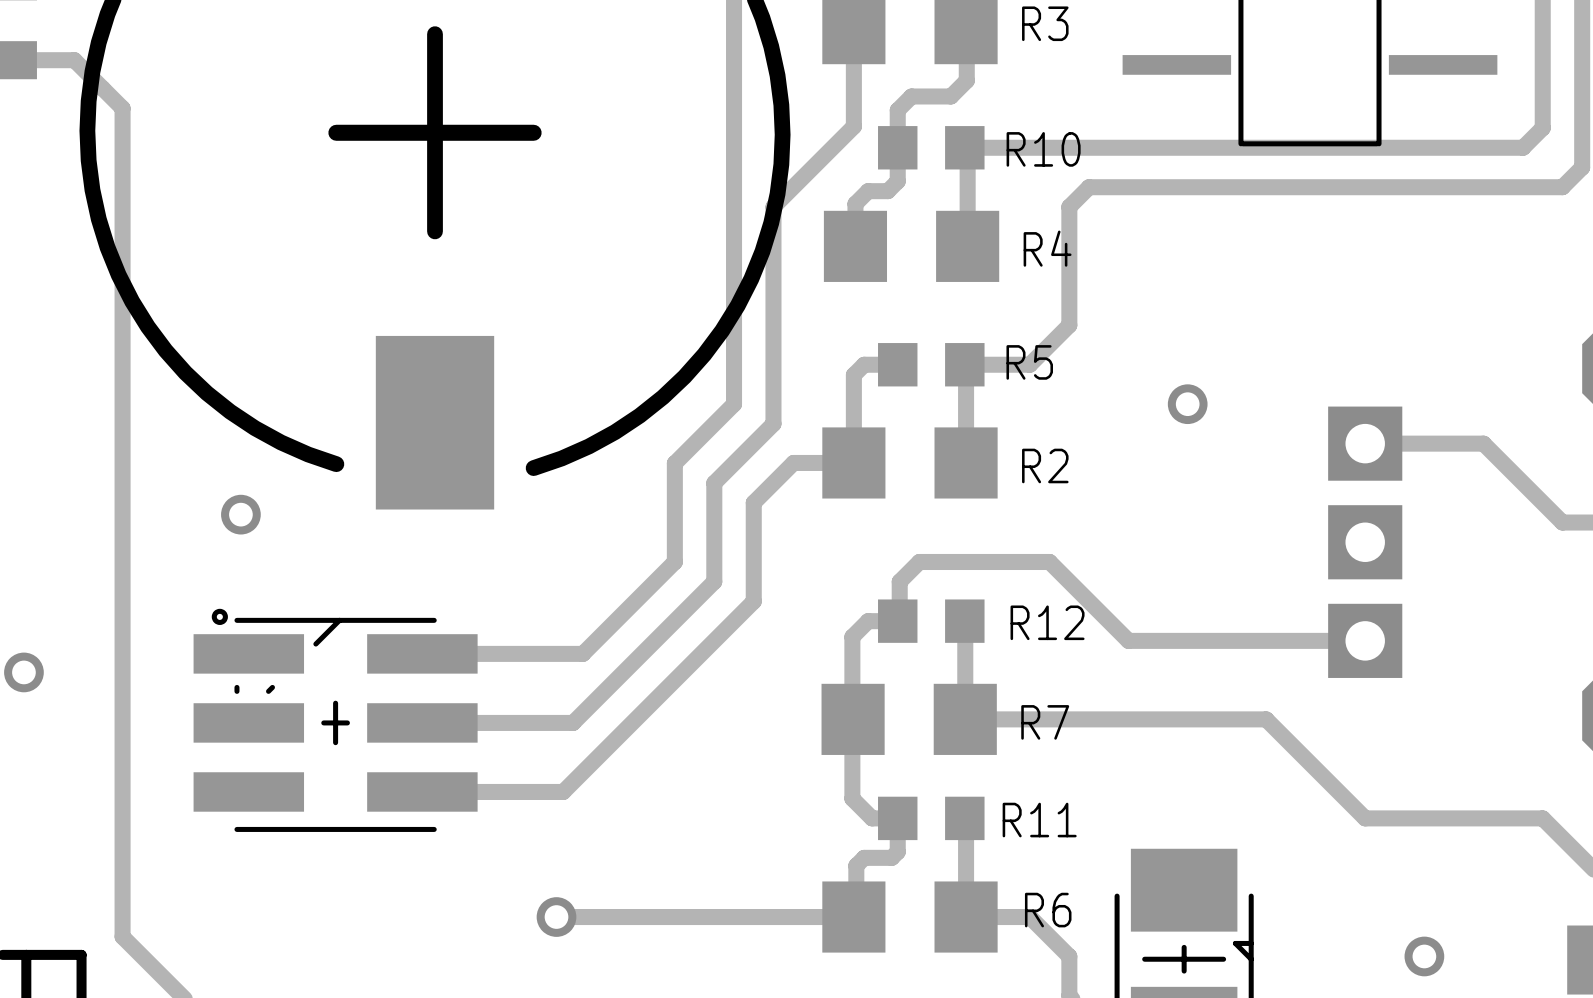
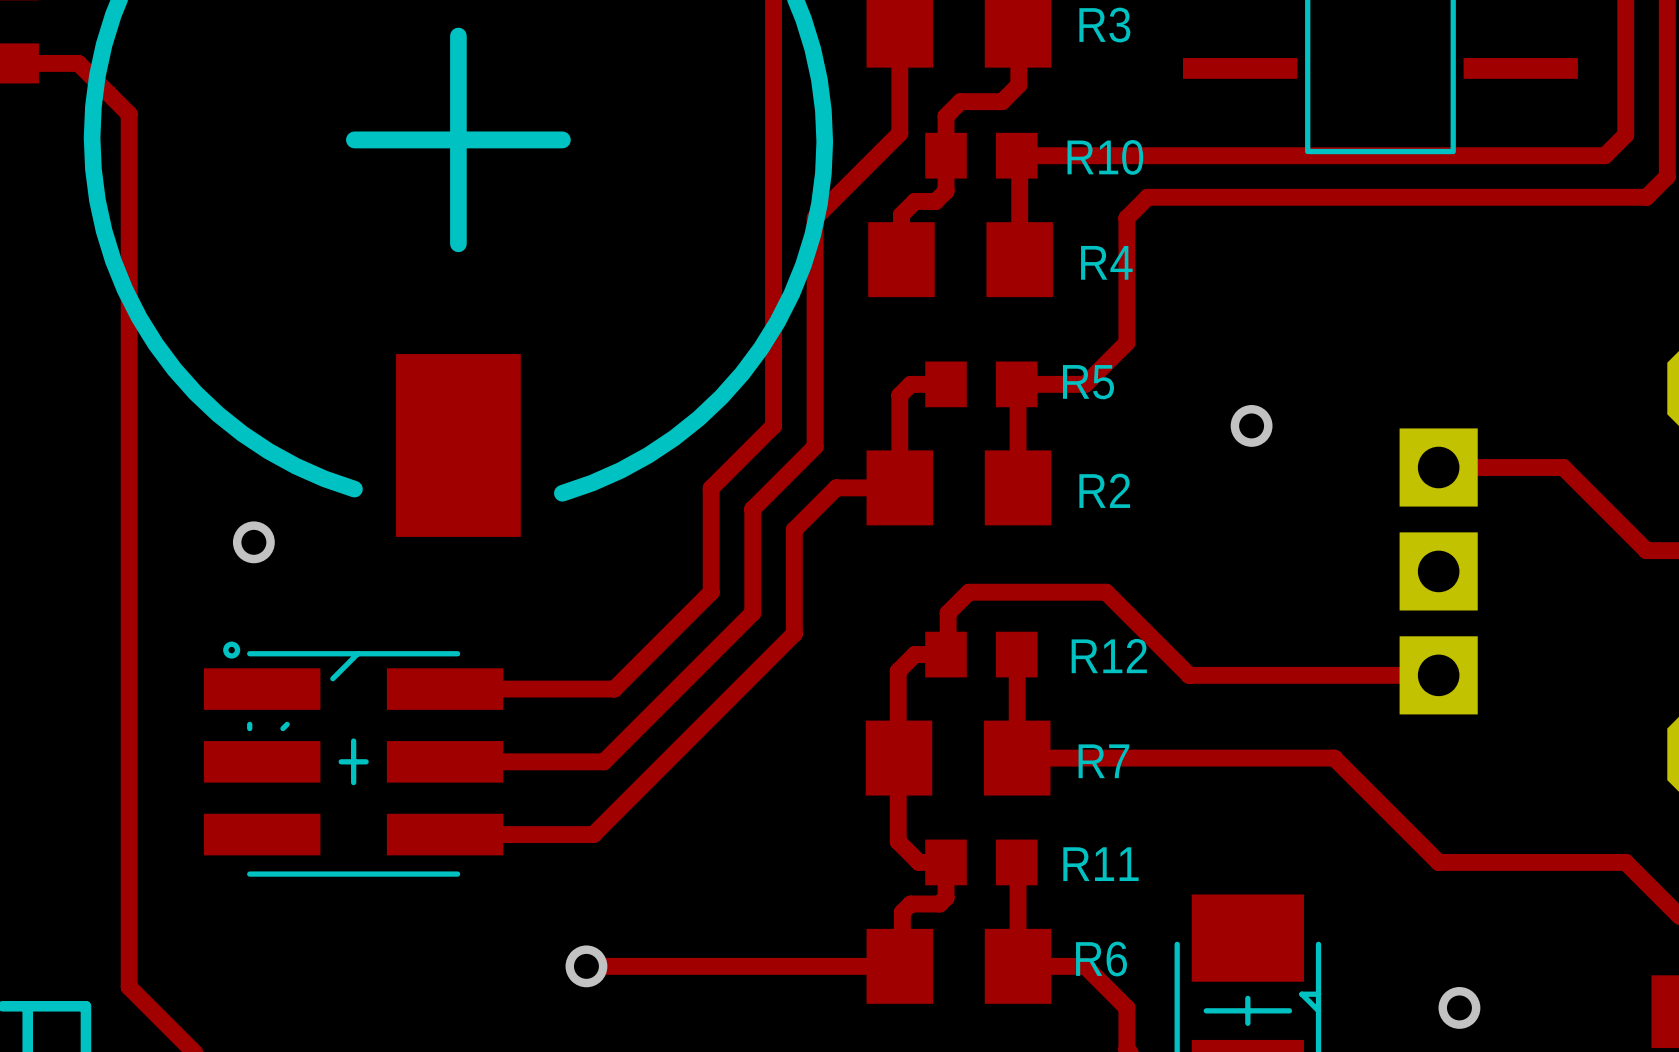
via: (23, 672) -> none
via position: (1424, 956) -> (1459, 1007)

